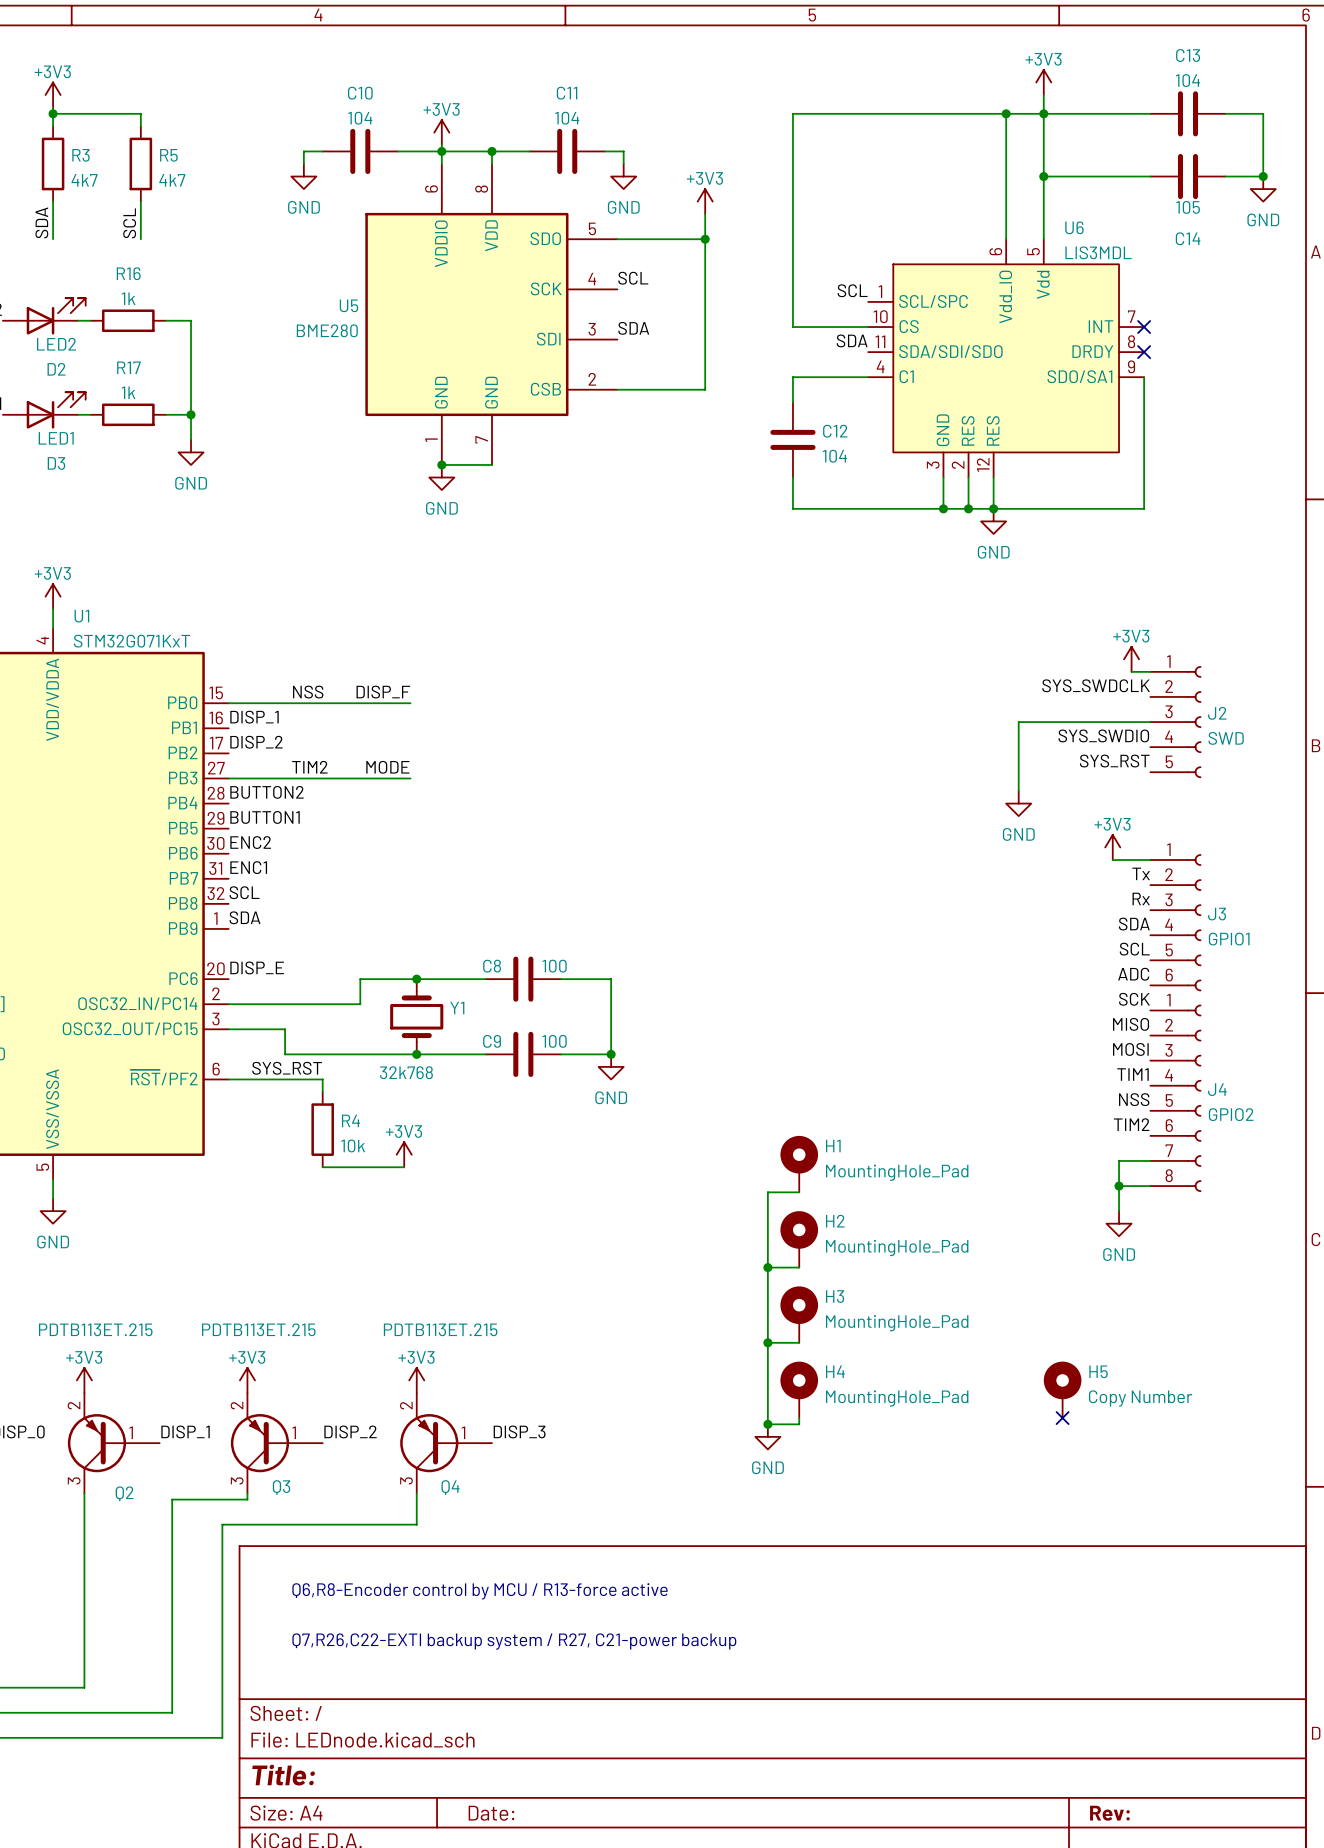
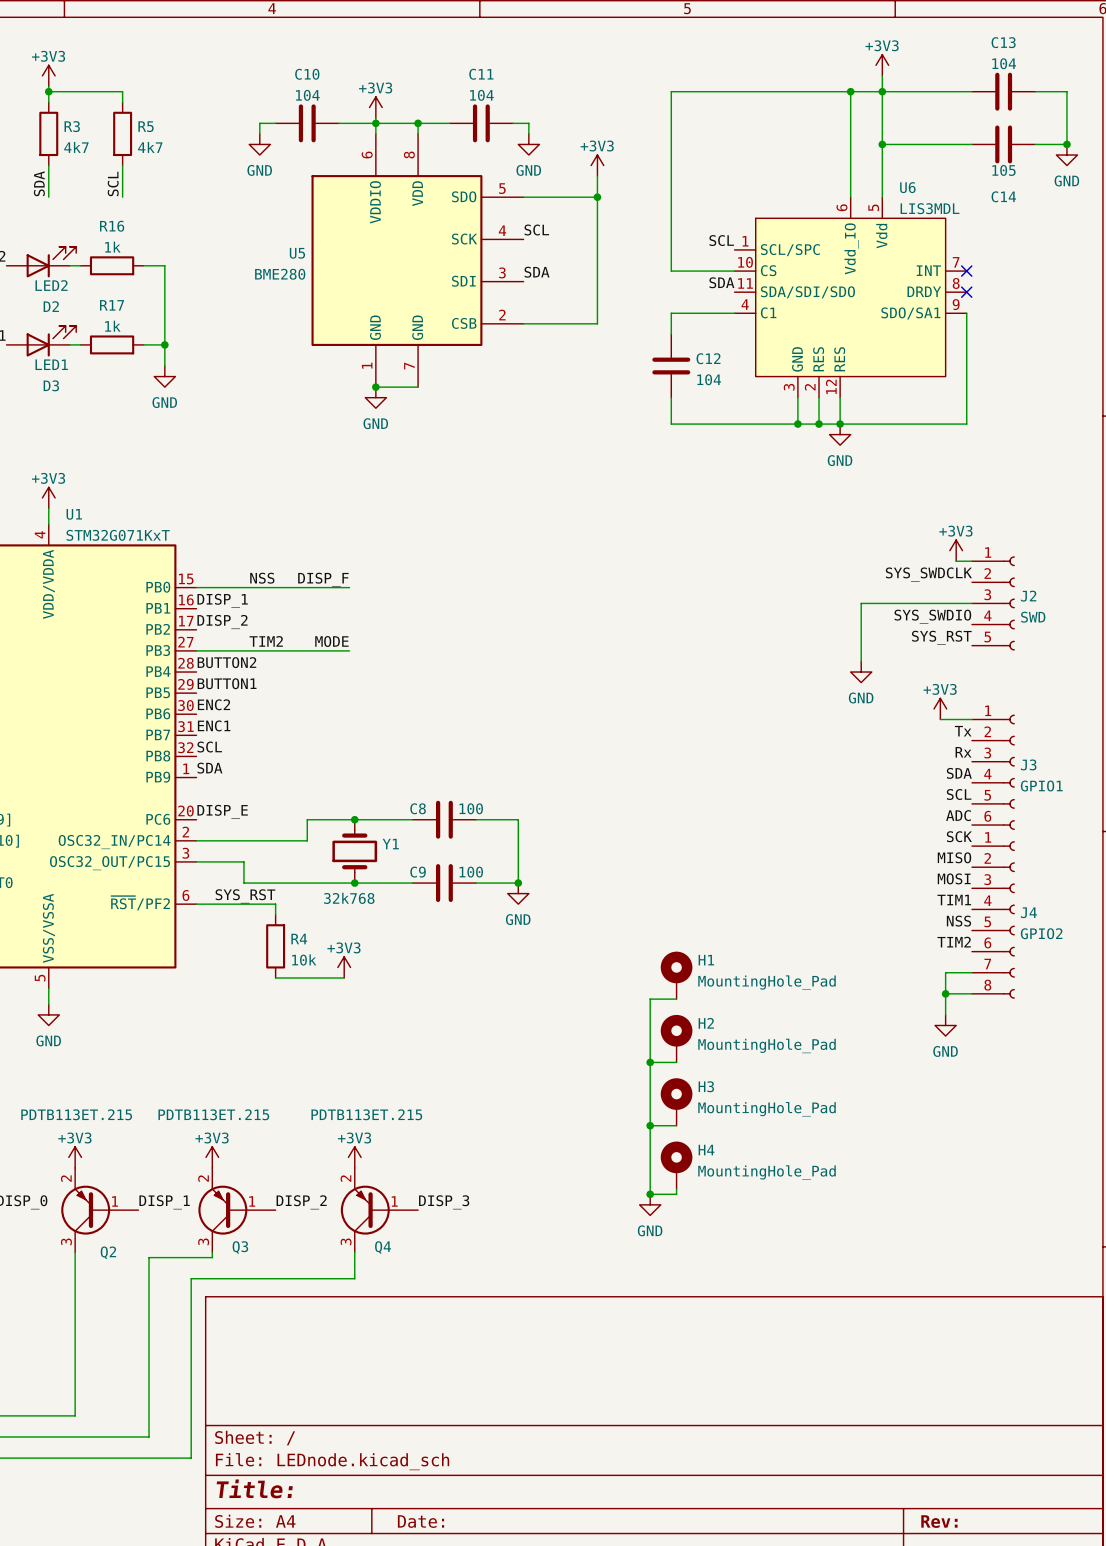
H5: Copy Number (1062, 1389) -> none
no-connect mark: (1062, 1418) -> none
text: Q6,R8-Encoder control by MCU / R13-force active (480, 1591) -> none
text: Q7,R26,C22-EXTI backup system / R27, C21-power backup (514, 1641) -> none

